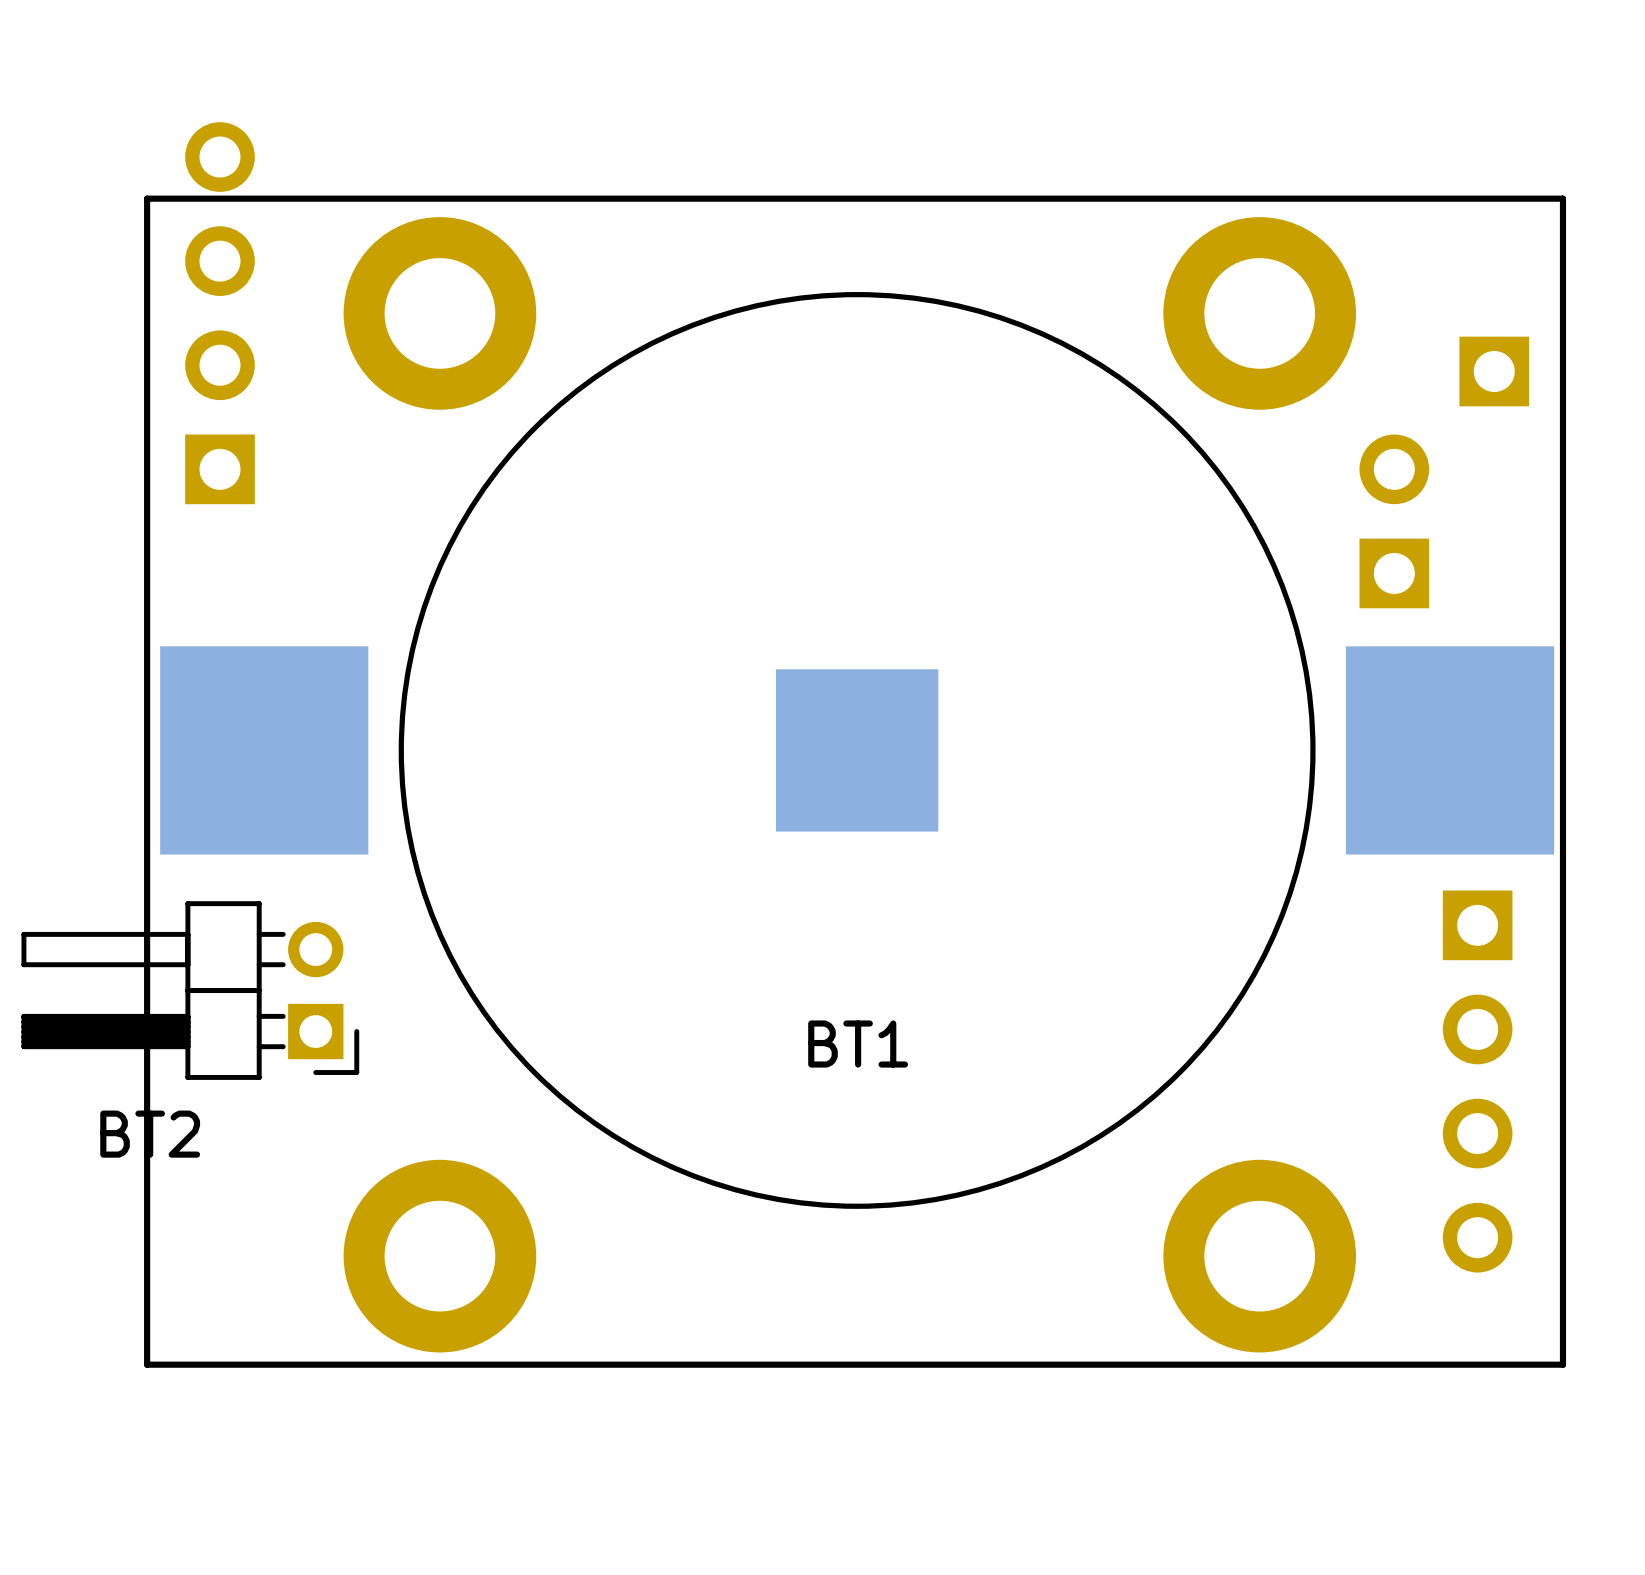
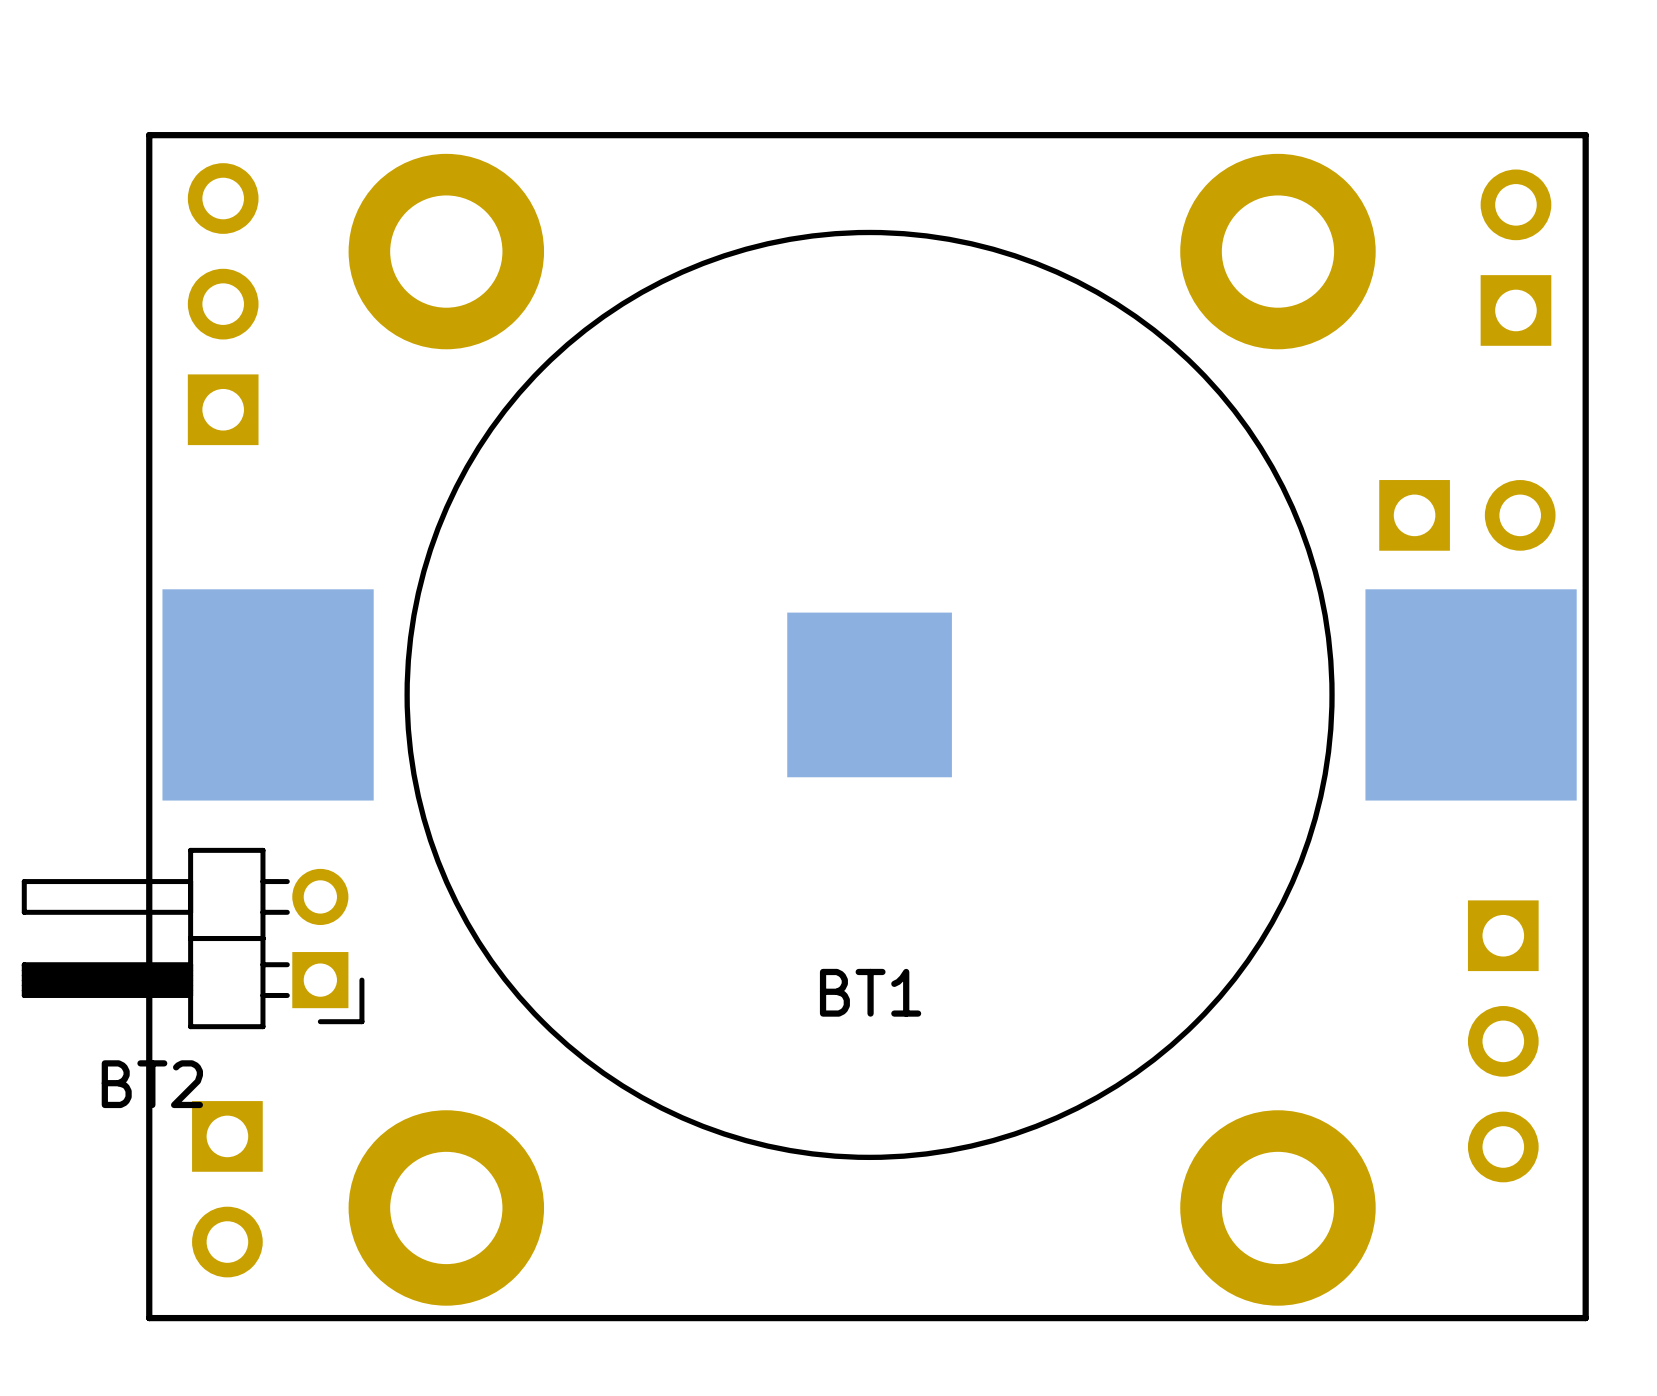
part: (219, 313) -> none
part: none -> (1515, 257)
part rotation: 0° (1394, 521) -> 90° clockwise (1467, 515)
part footprint: [1442, 890, 1513, 1273] -> [1467, 900, 1539, 1183]
part: none -> (227, 1189)

